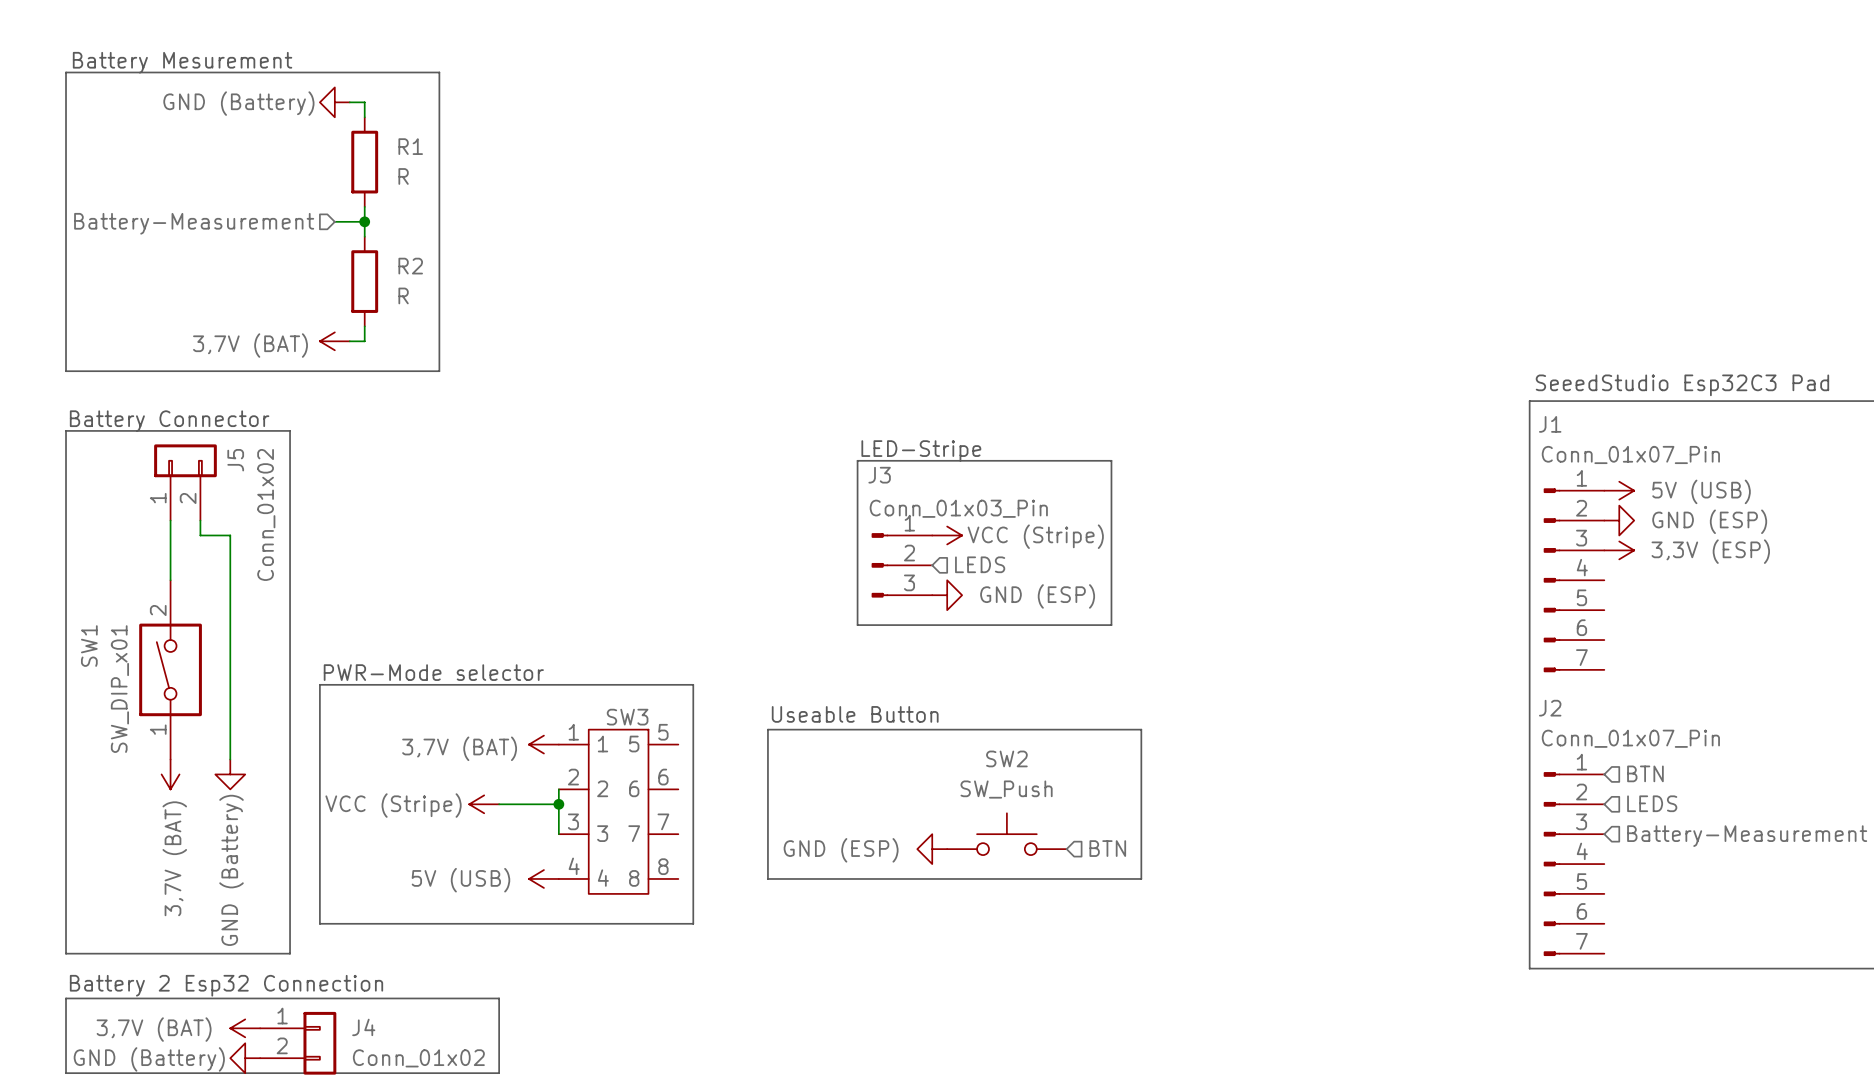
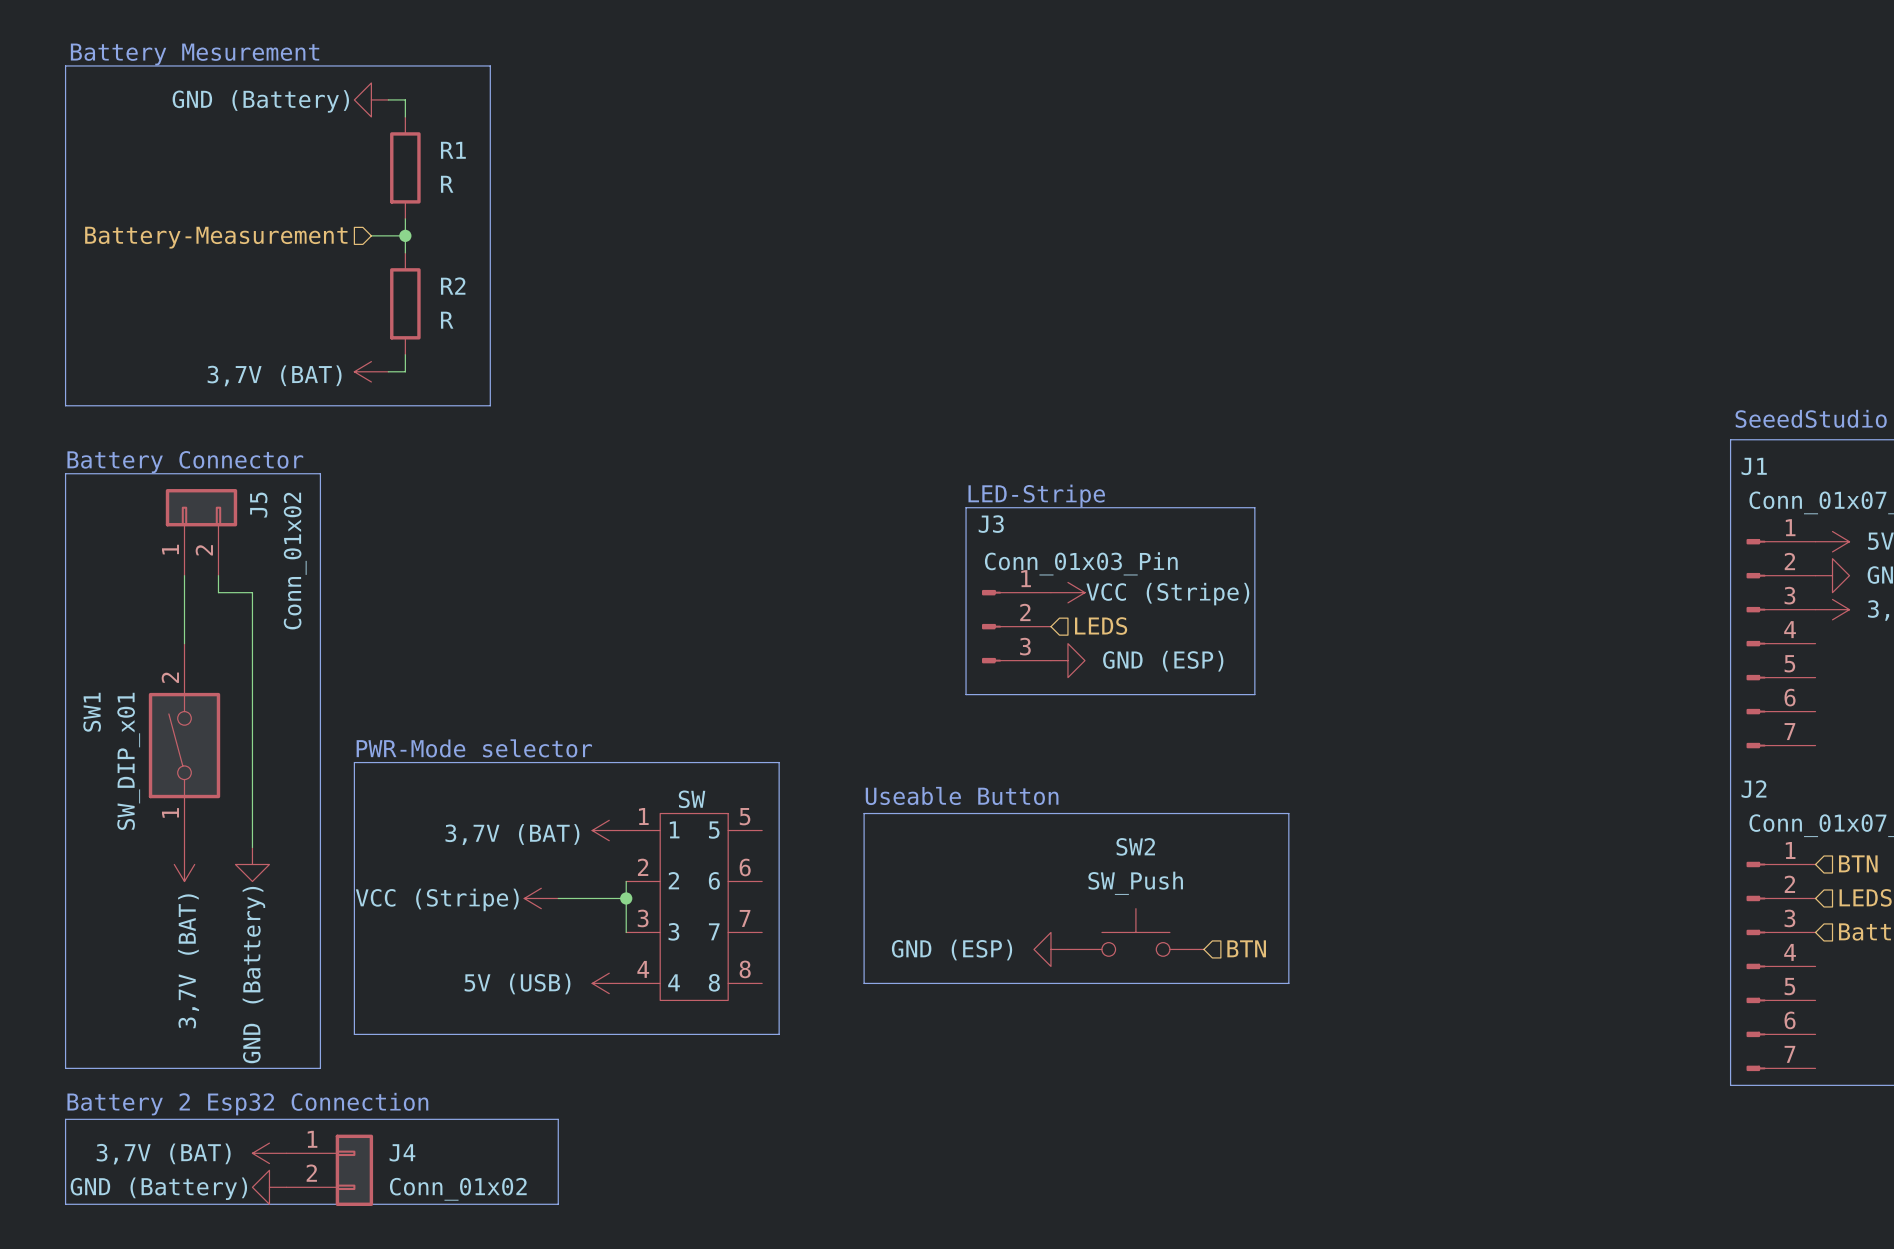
SW3 name: SW3 (627, 717) -> SW (692, 799)

